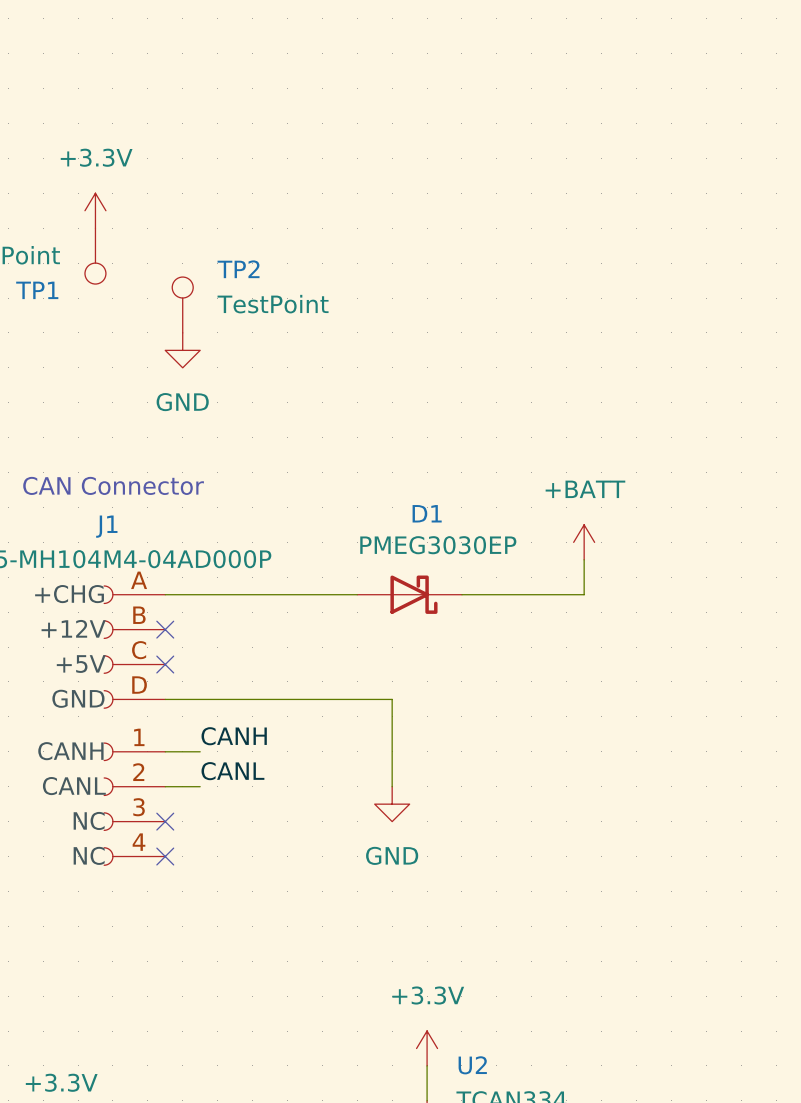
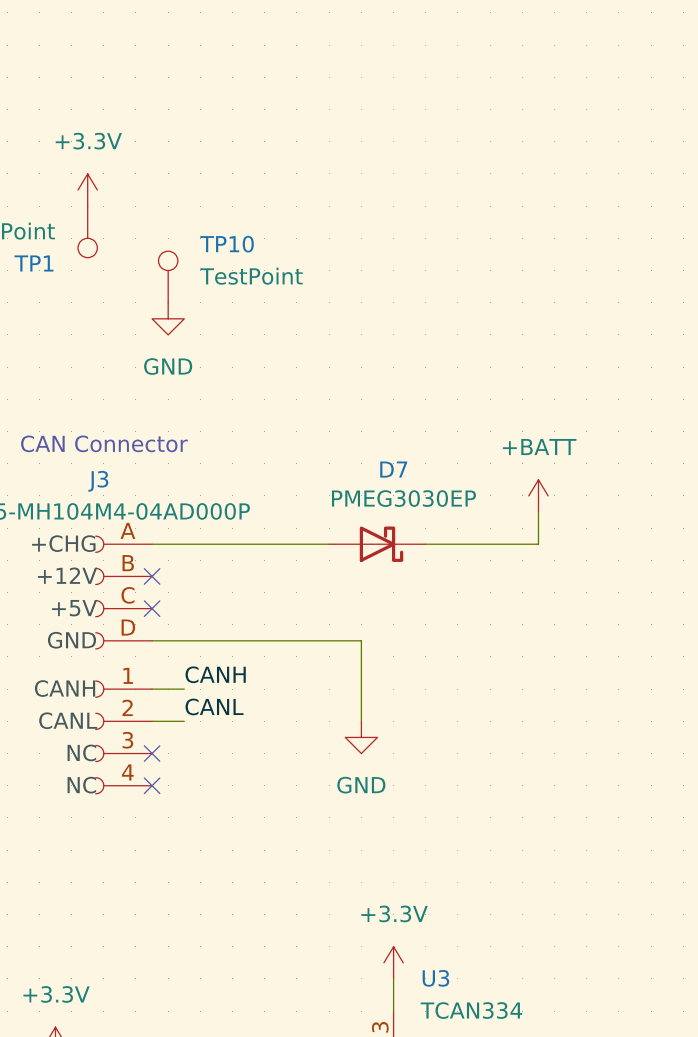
TP2 name: TP2 (238, 269) -> TP10 (227, 244)
D1 name: D1 (427, 513) -> D7 (393, 469)
J1 name: J1 (106, 526) -> J3 (98, 481)
U2 name: U2 (472, 1065) -> U3 (435, 978)

